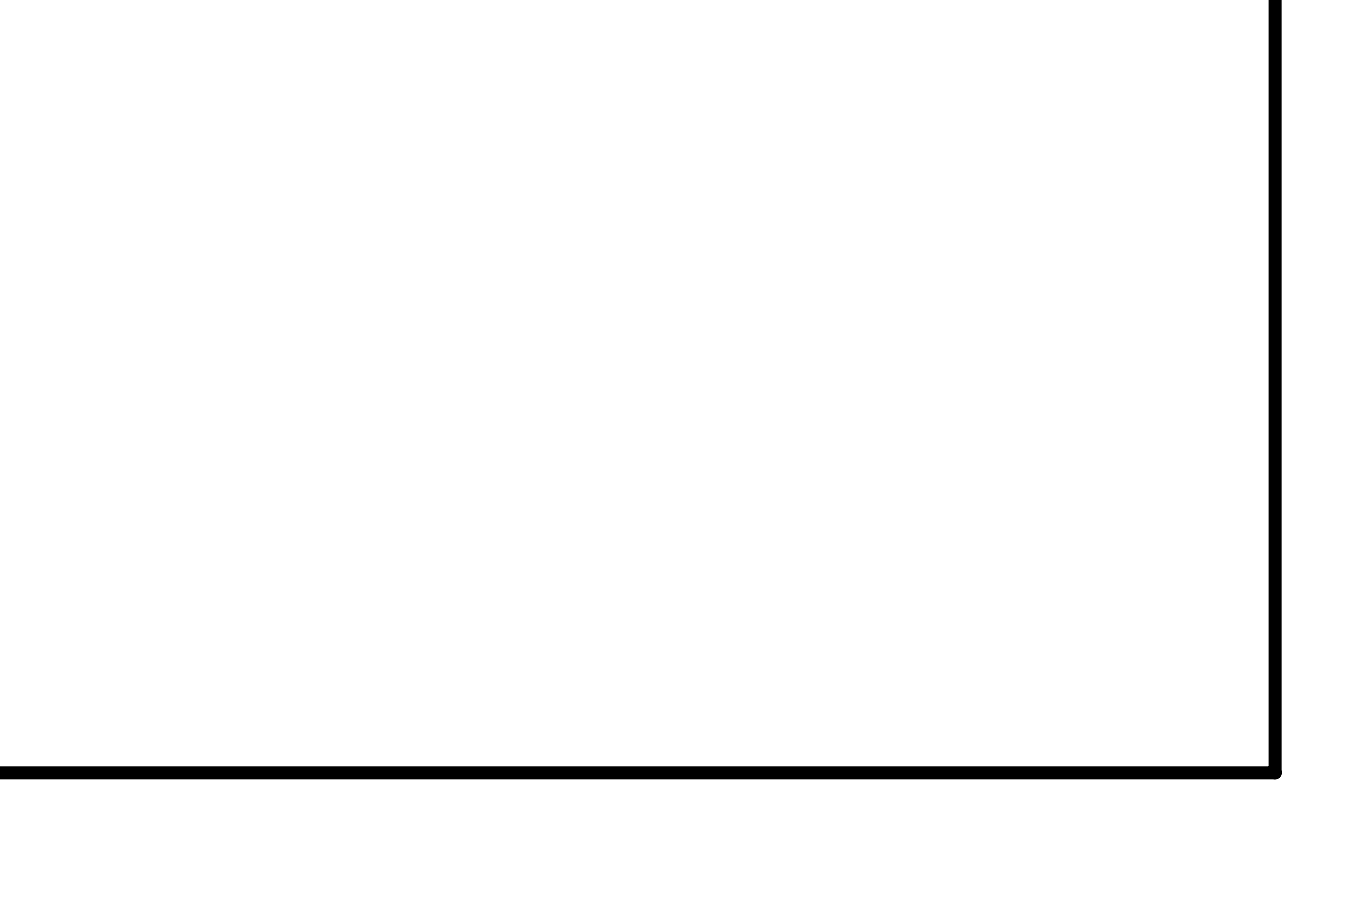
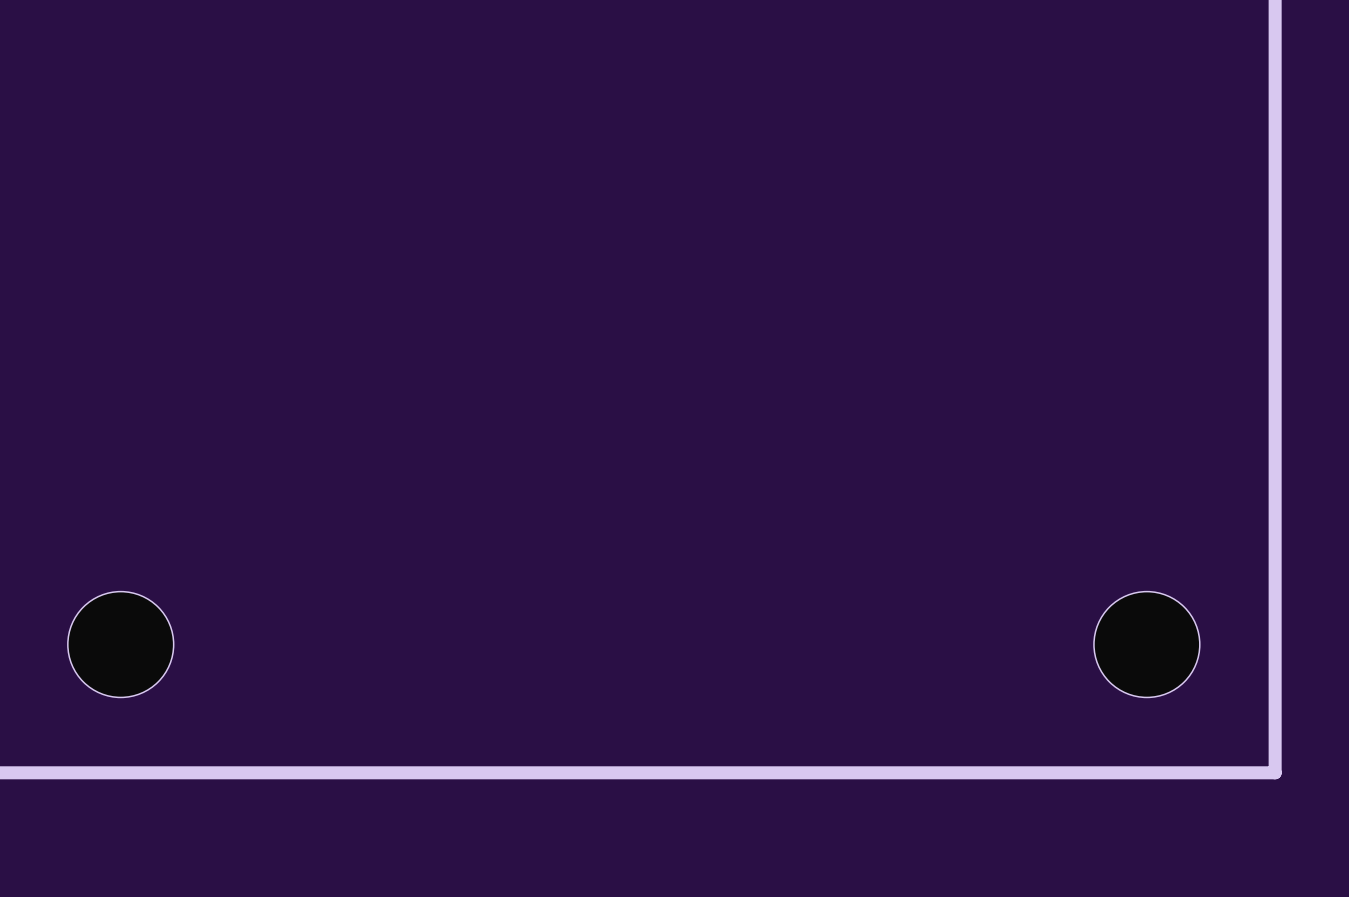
hole: none -> (120, 644)
hole: none -> (1146, 644)

